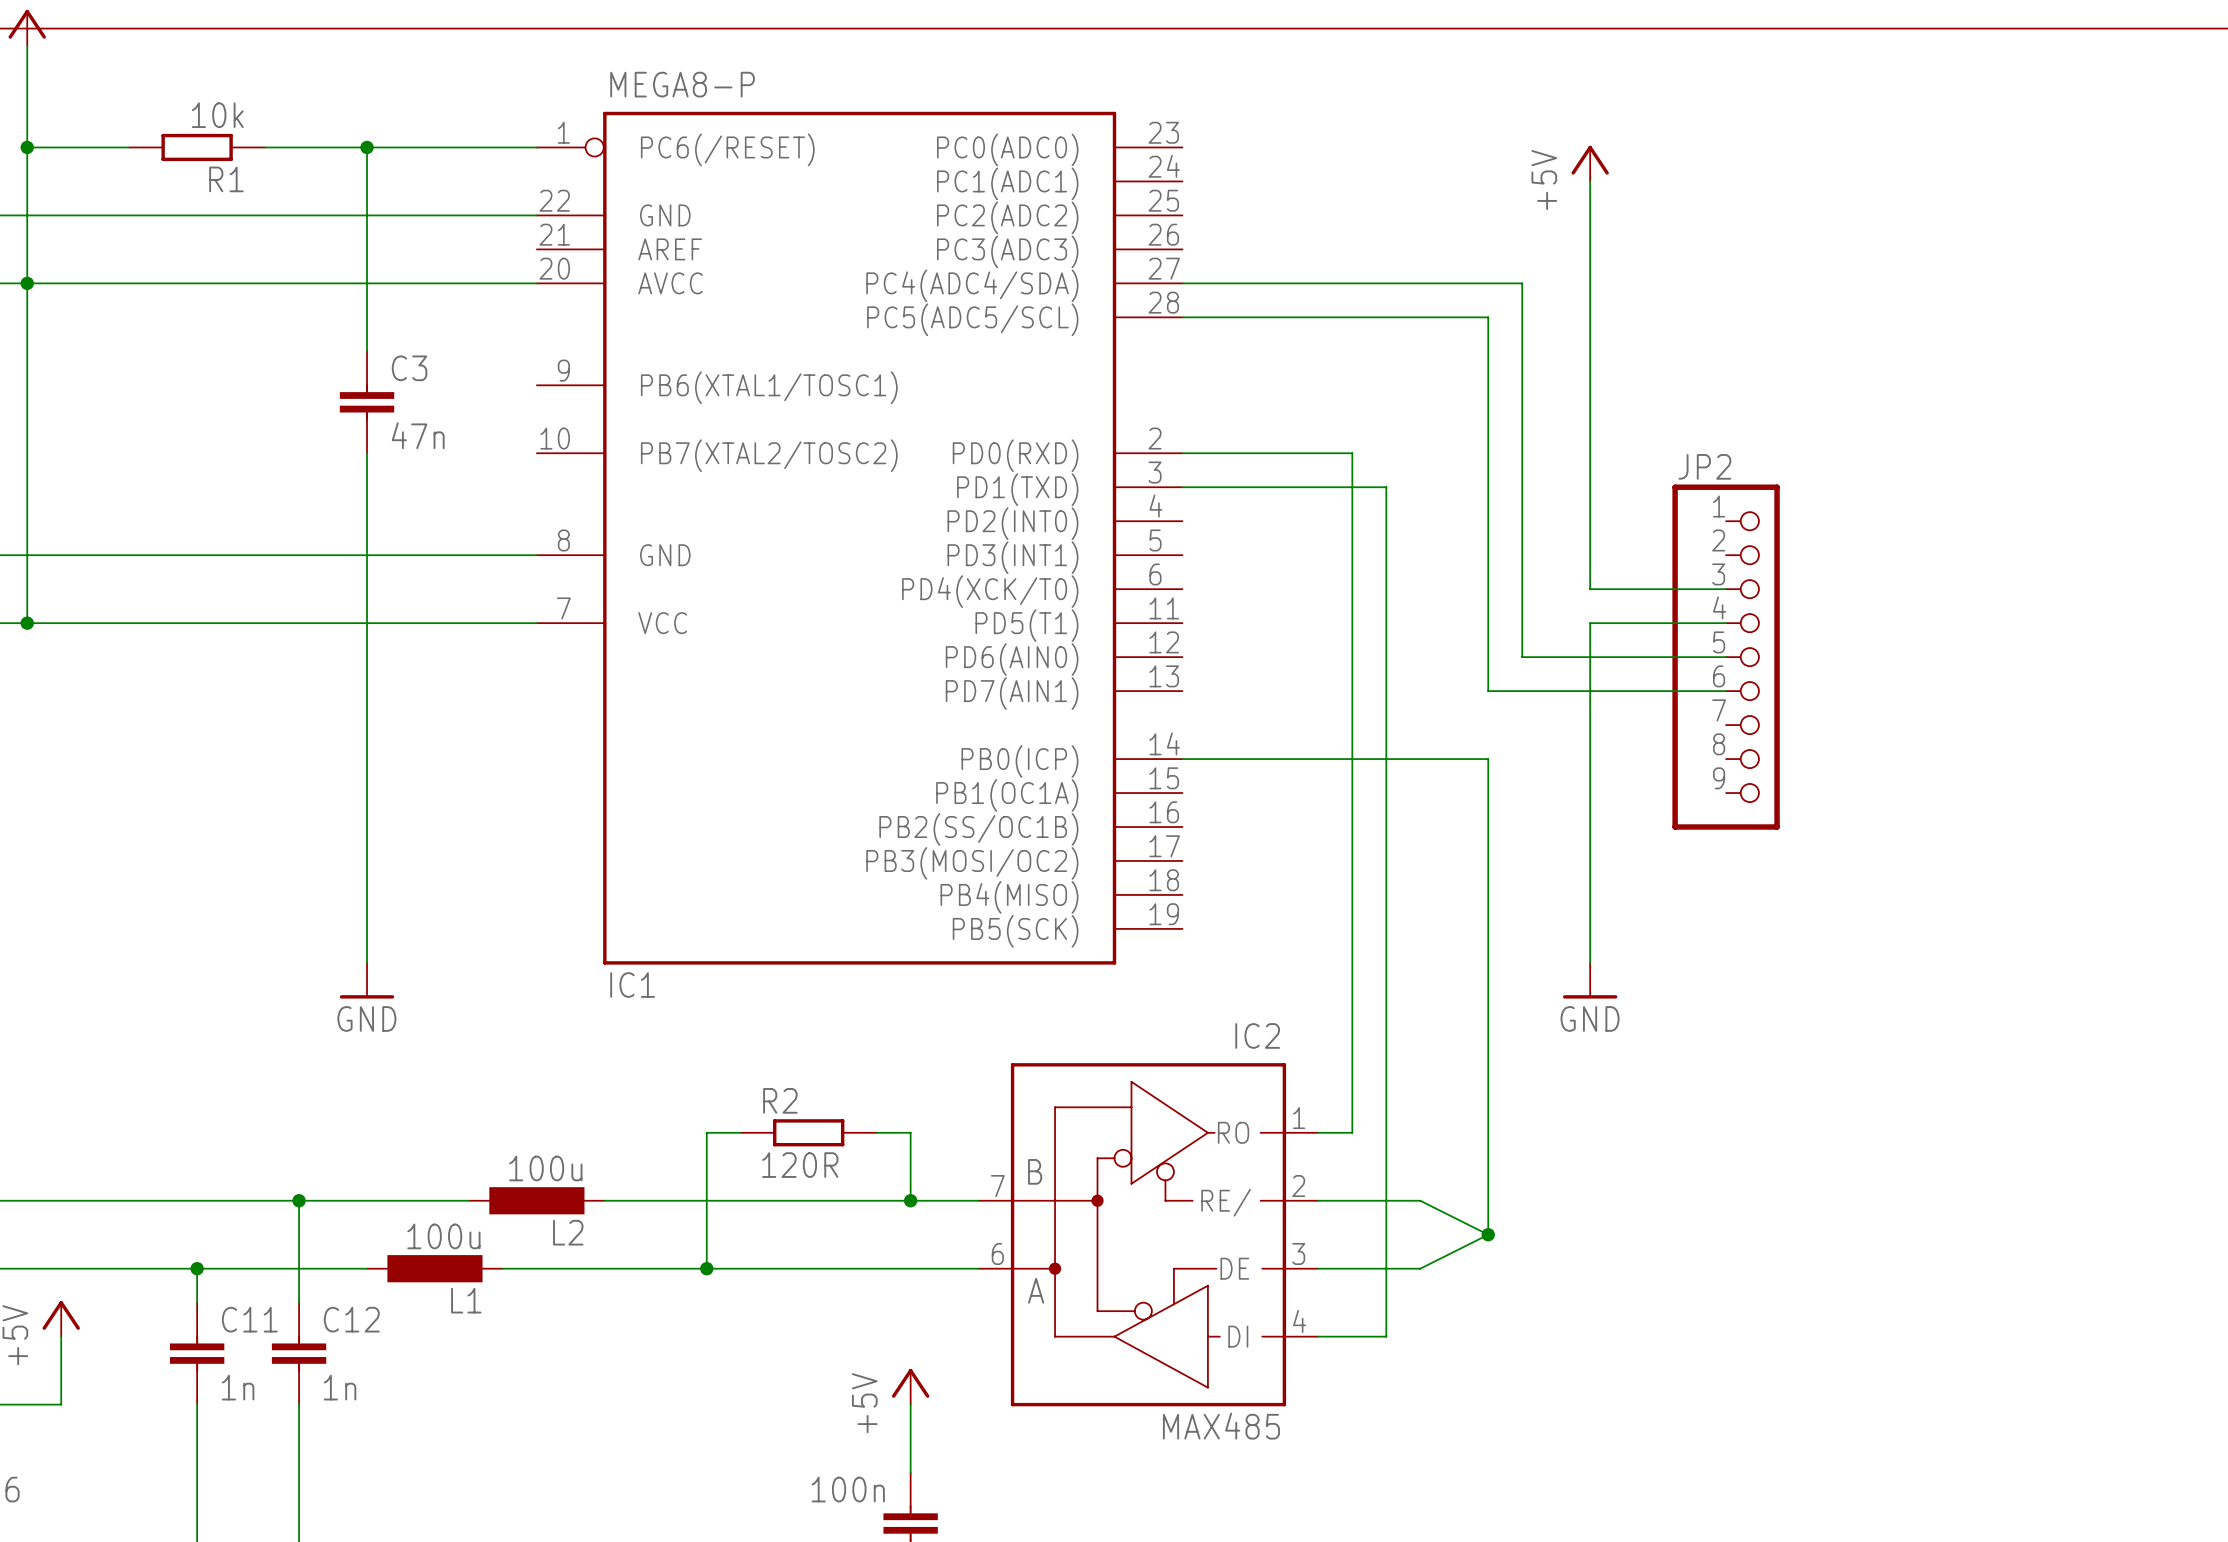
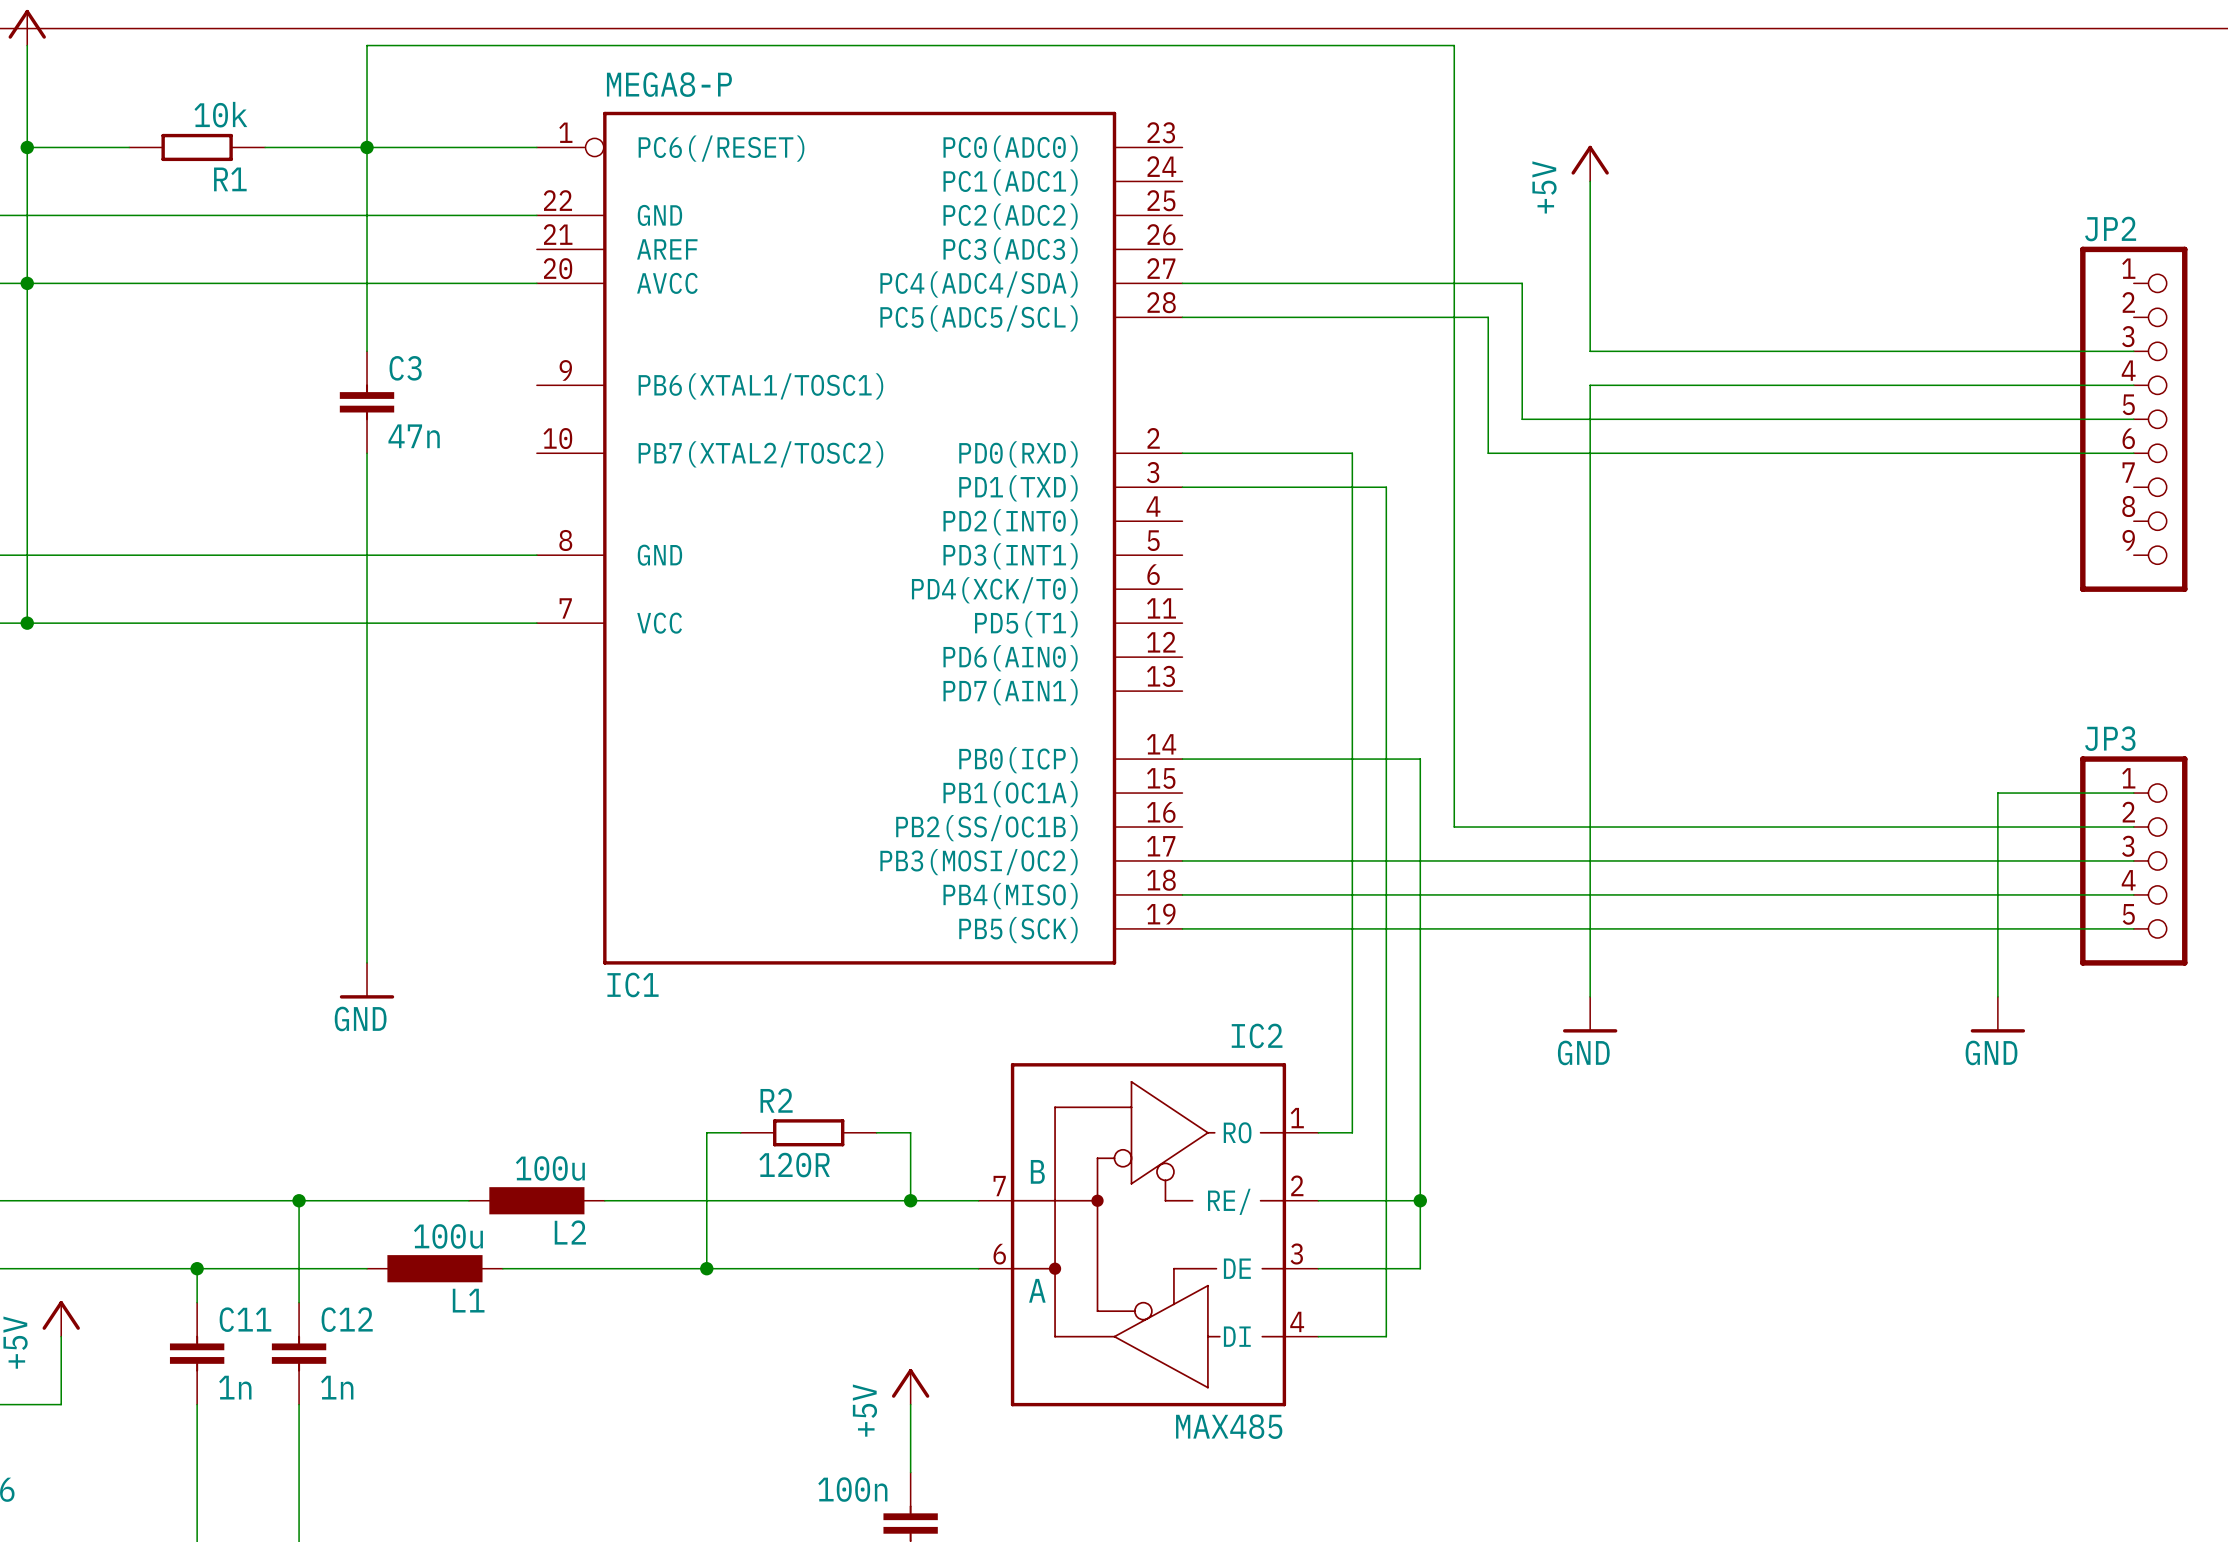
wire: none -> (367, 147) (367, 45) (1454, 45) (1454, 827) (2133, 827)
wire: (1590, 351) (1590, 385) -> (1590, 351) (2133, 351)
wire: none -> (1590, 385) (2133, 385)
wire: (1522, 419) (1522, 657) (1726, 657) -> (1522, 419) (2133, 419)
wire: (1488, 453) (1488, 691) (1726, 691) -> (1488, 453) (2133, 453)
wire: (1590, 589) (1726, 589) -> (1590, 589) (1590, 623)
wire: (1590, 623) (1726, 623) -> none
JP2 position: (1726, 657) -> (2133, 419)
wire: (1420, 759) (1488, 759) (1488, 1234) -> (1420, 759) (1420, 1268)
wire: none -> (2133, 793) (1997, 793) (1997, 996)
wire: none -> (1182, 860) (2133, 860)
JP3: none -> (2133, 860)
wire: none -> (1182, 894) (2133, 894)
wire: none -> (1182, 928) (2133, 928)
power symbol position: GND (1590, 980) -> GND (1590, 1014)
power symbol: none -> GND (1997, 1014)
wire: (1420, 1200) (1488, 1234) -> none
wire: (1488, 1234) (1420, 1268) -> none
junction position: (1488, 1234) -> (1420, 1200)

